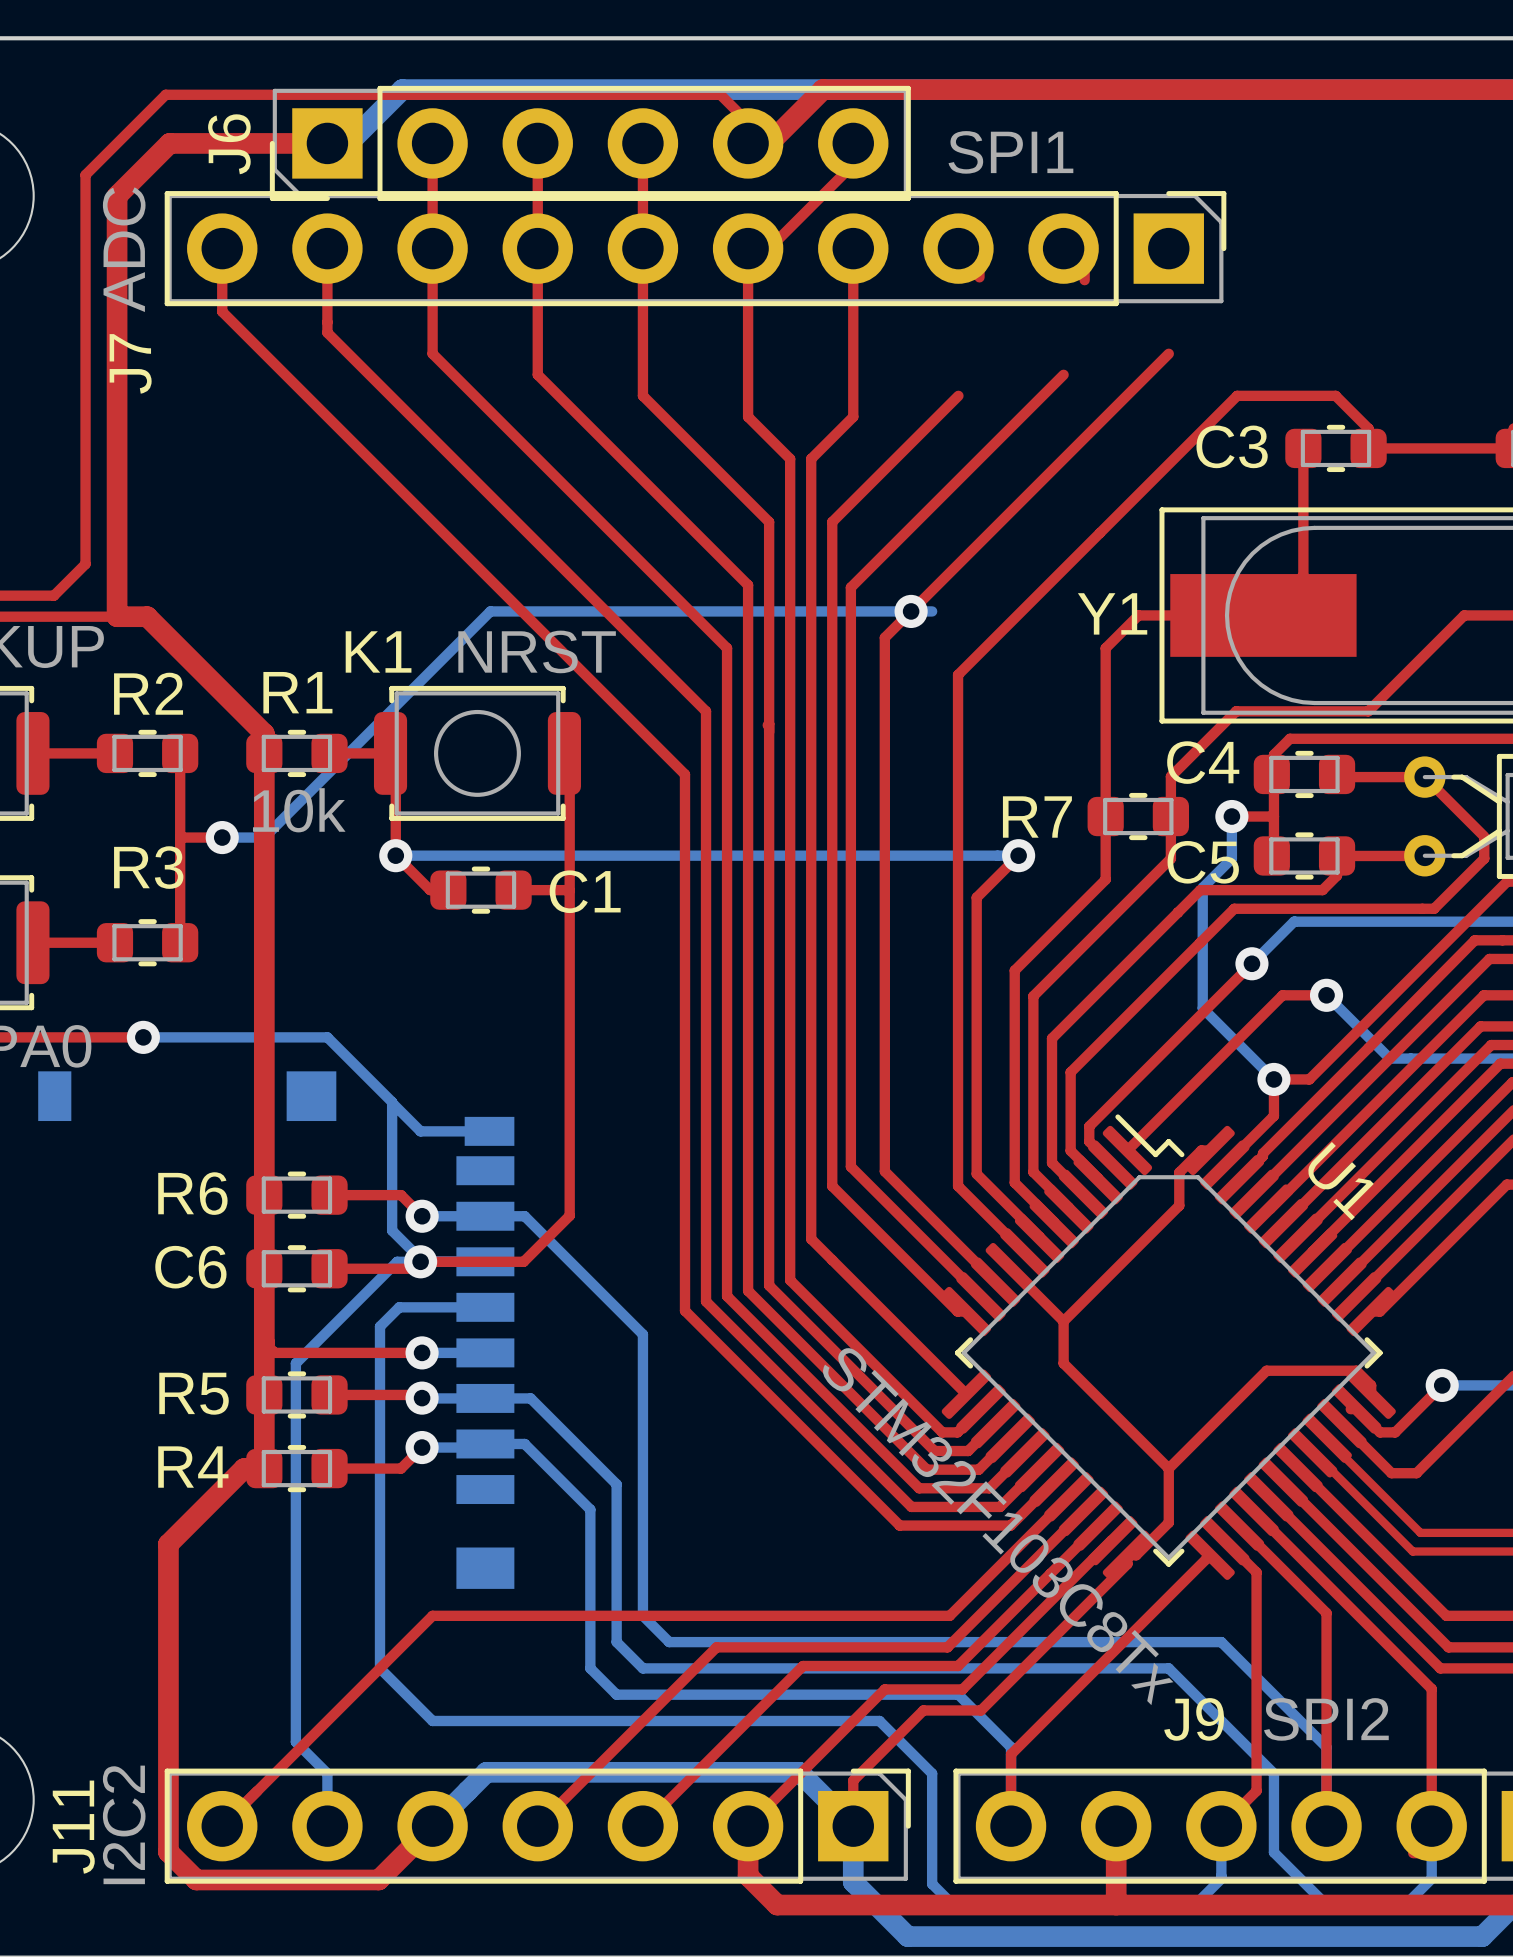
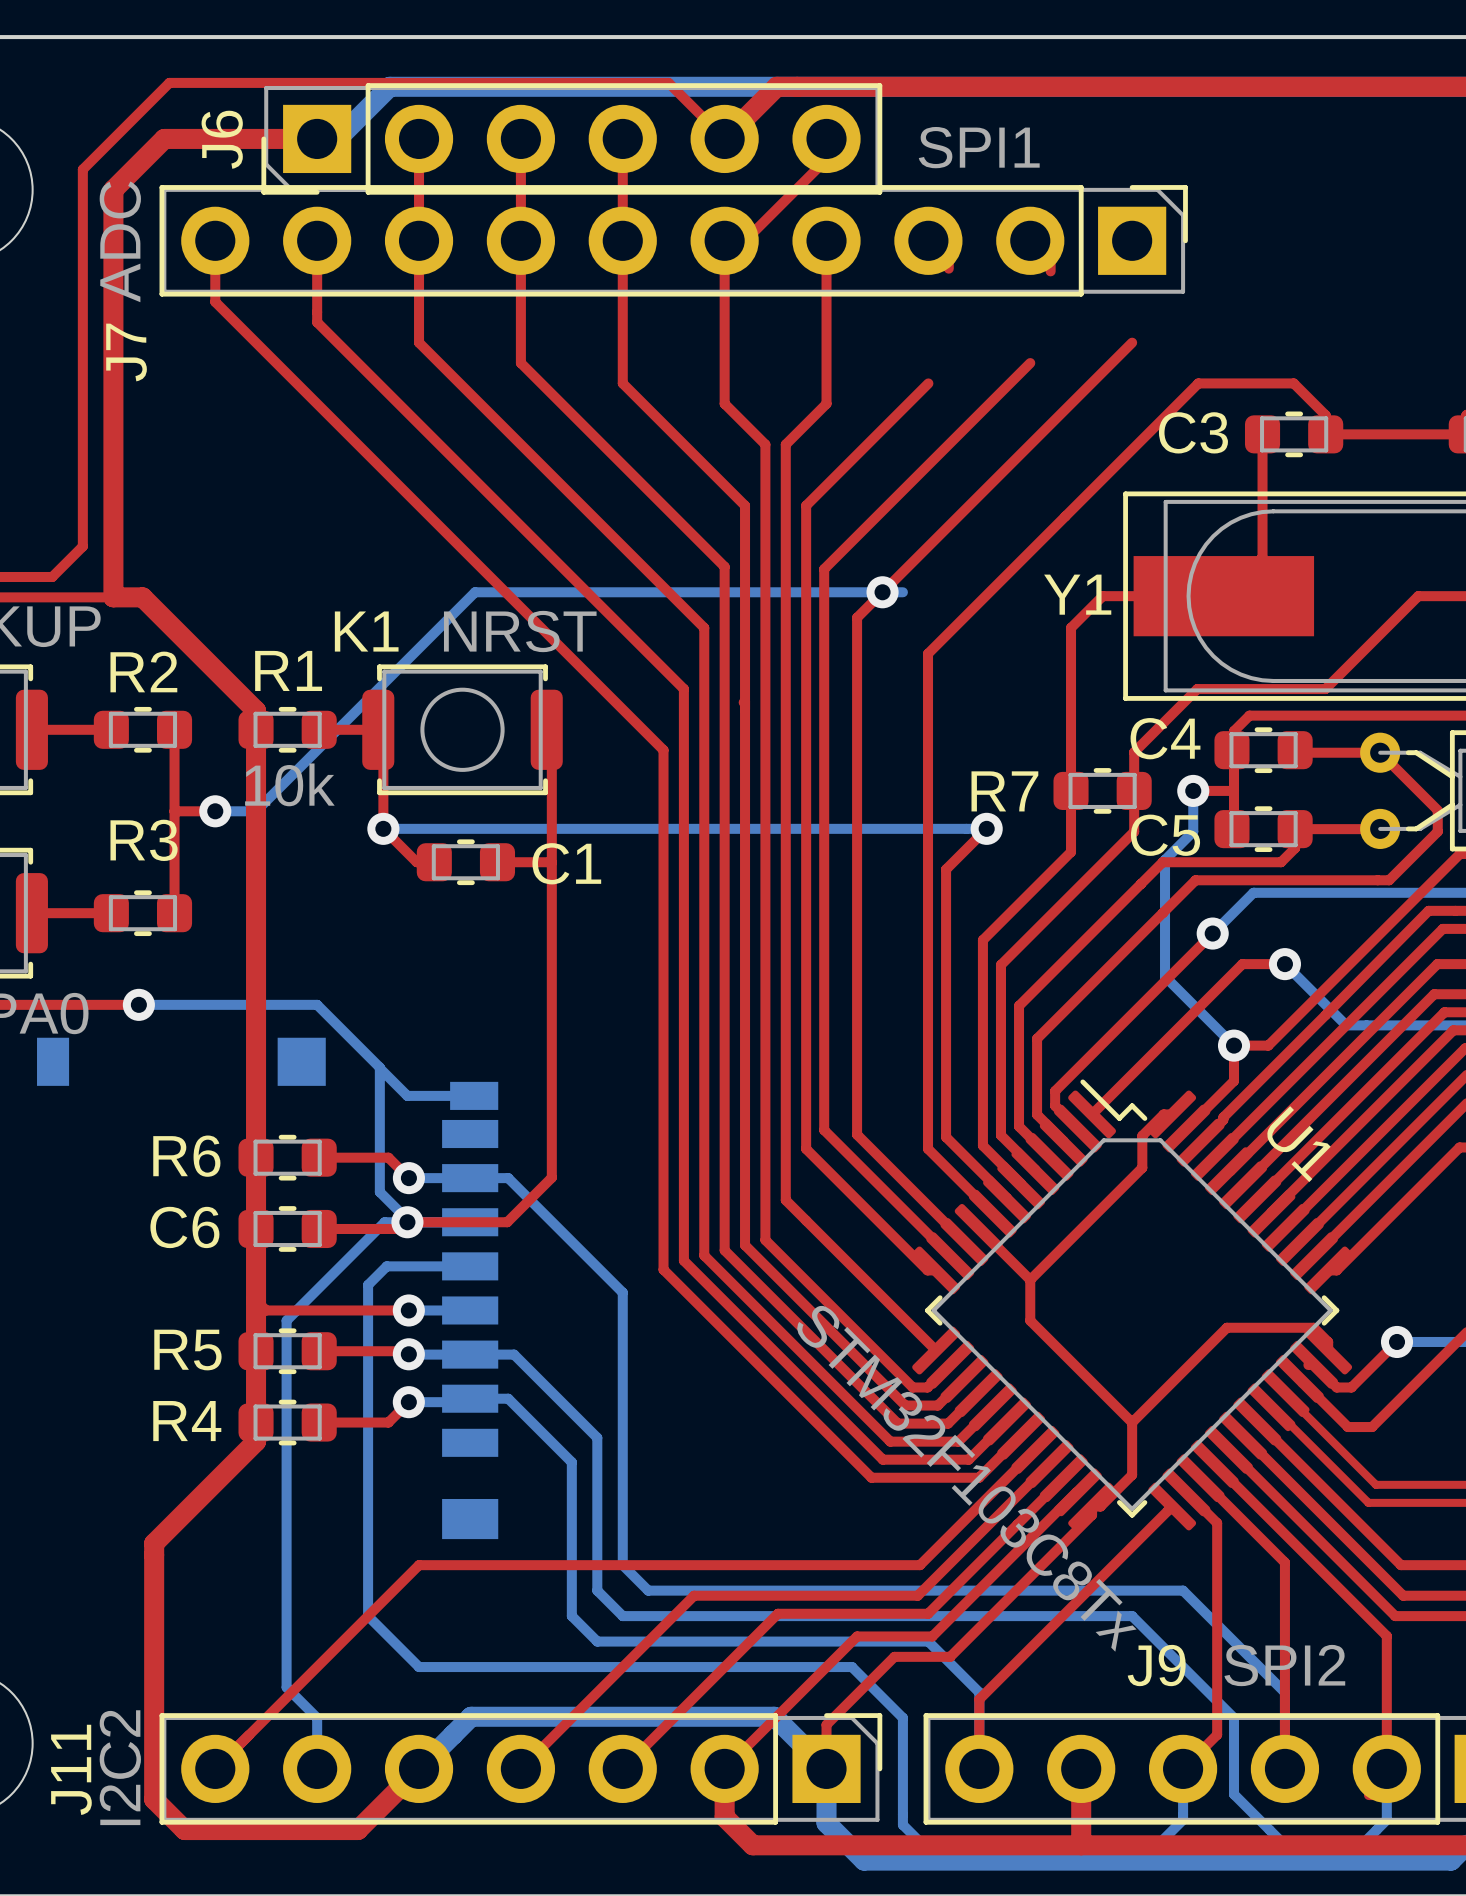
top track: (822, 89) (769, 143) (720, 94) (165, 94) -> (797, 86) (776, 86) (724, 138) (668, 82) (169, 82) (160, 91)
top track: (264, 1468) (244, 1468) (168, 1544) (168, 1851) (196, 1879) (378, 1879) -> (256, 1422) (256, 1441) (154, 1543) (154, 1799) (184, 1830) (357, 1830) (366, 1821)
bottom track: (892, 1920) (907, 1936) (1482, 1936) (1498, 1920) -> (864, 1860) (1451, 1860)

